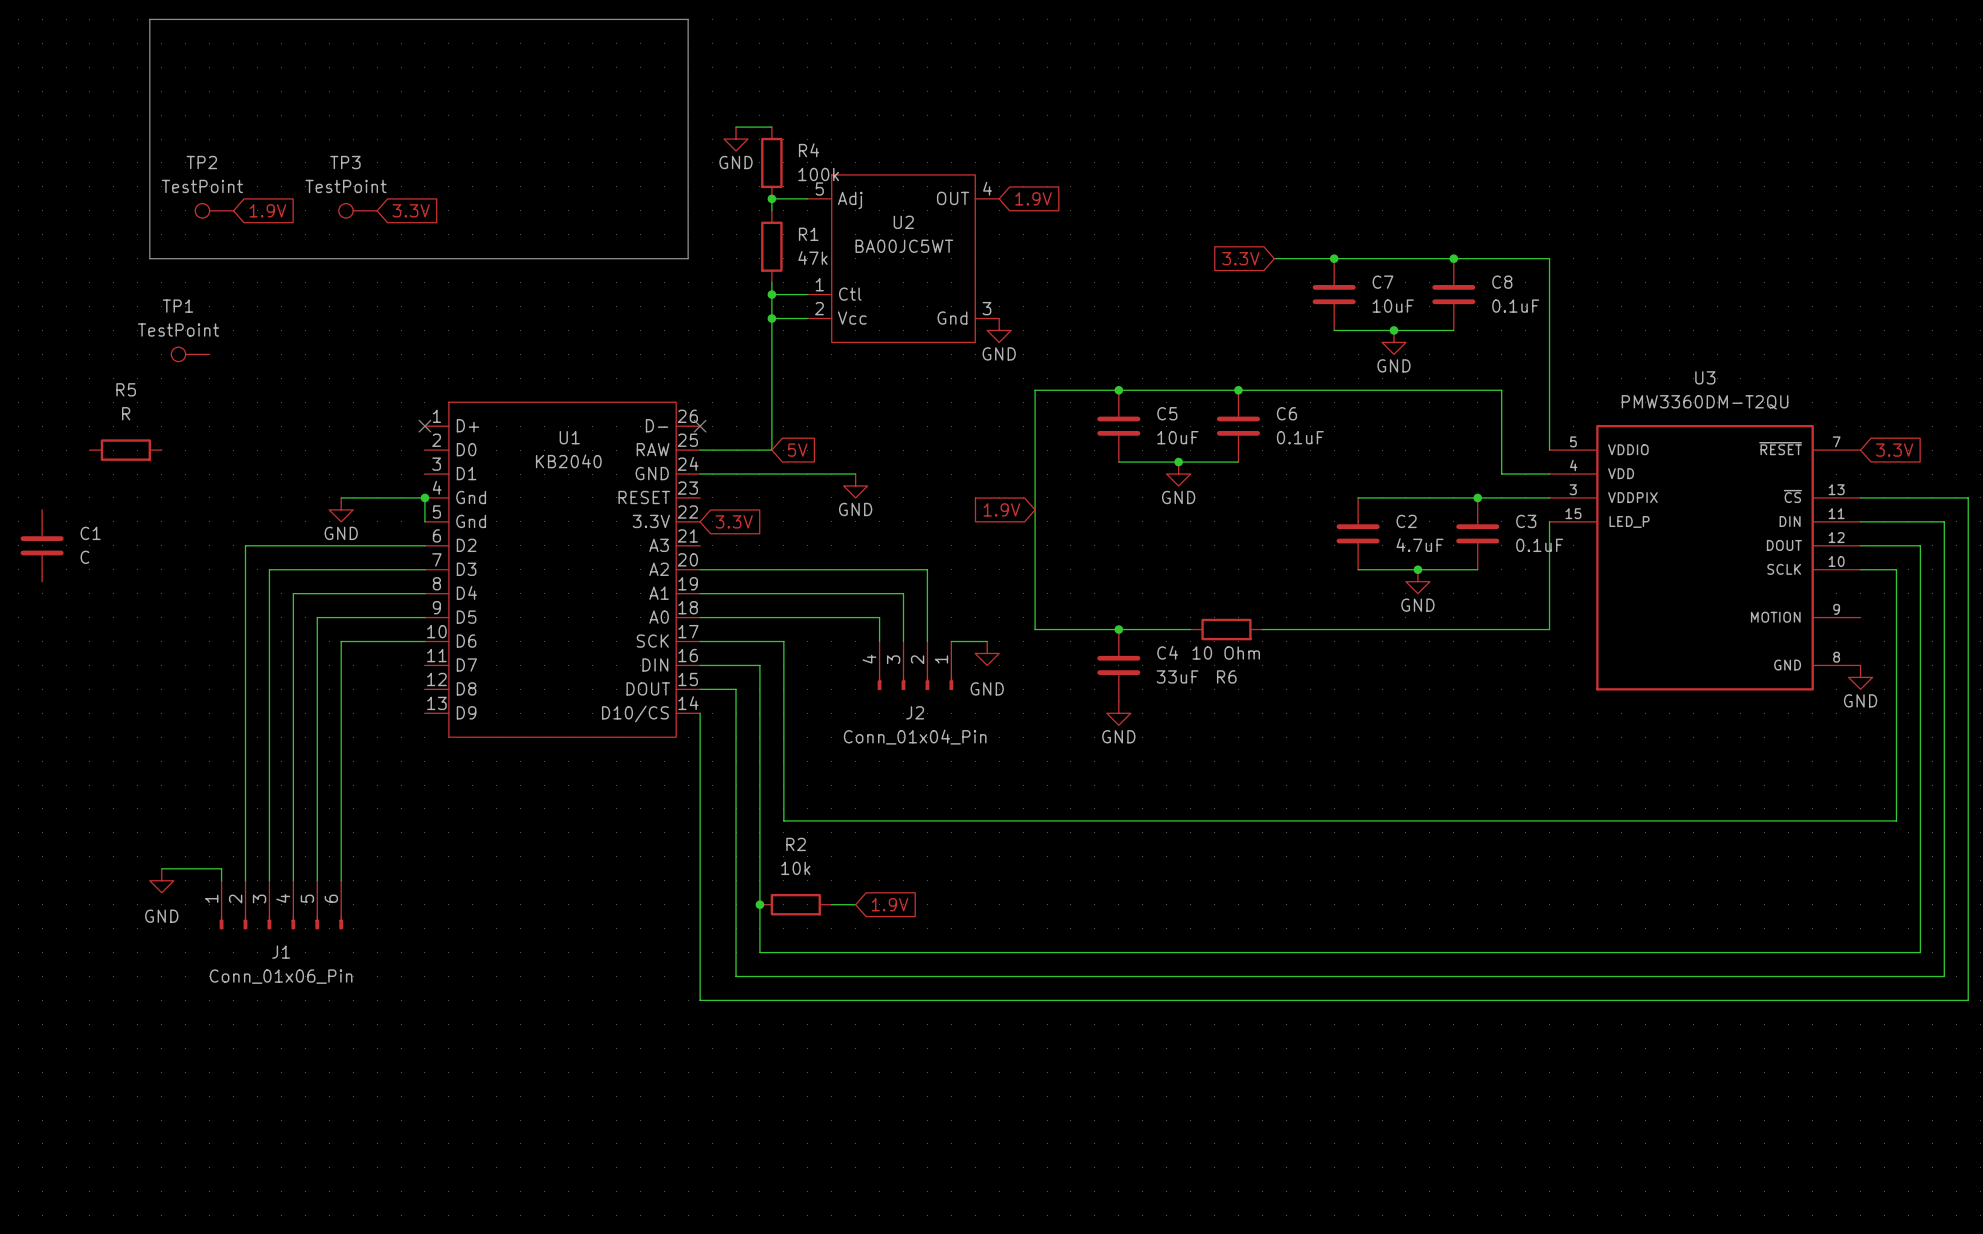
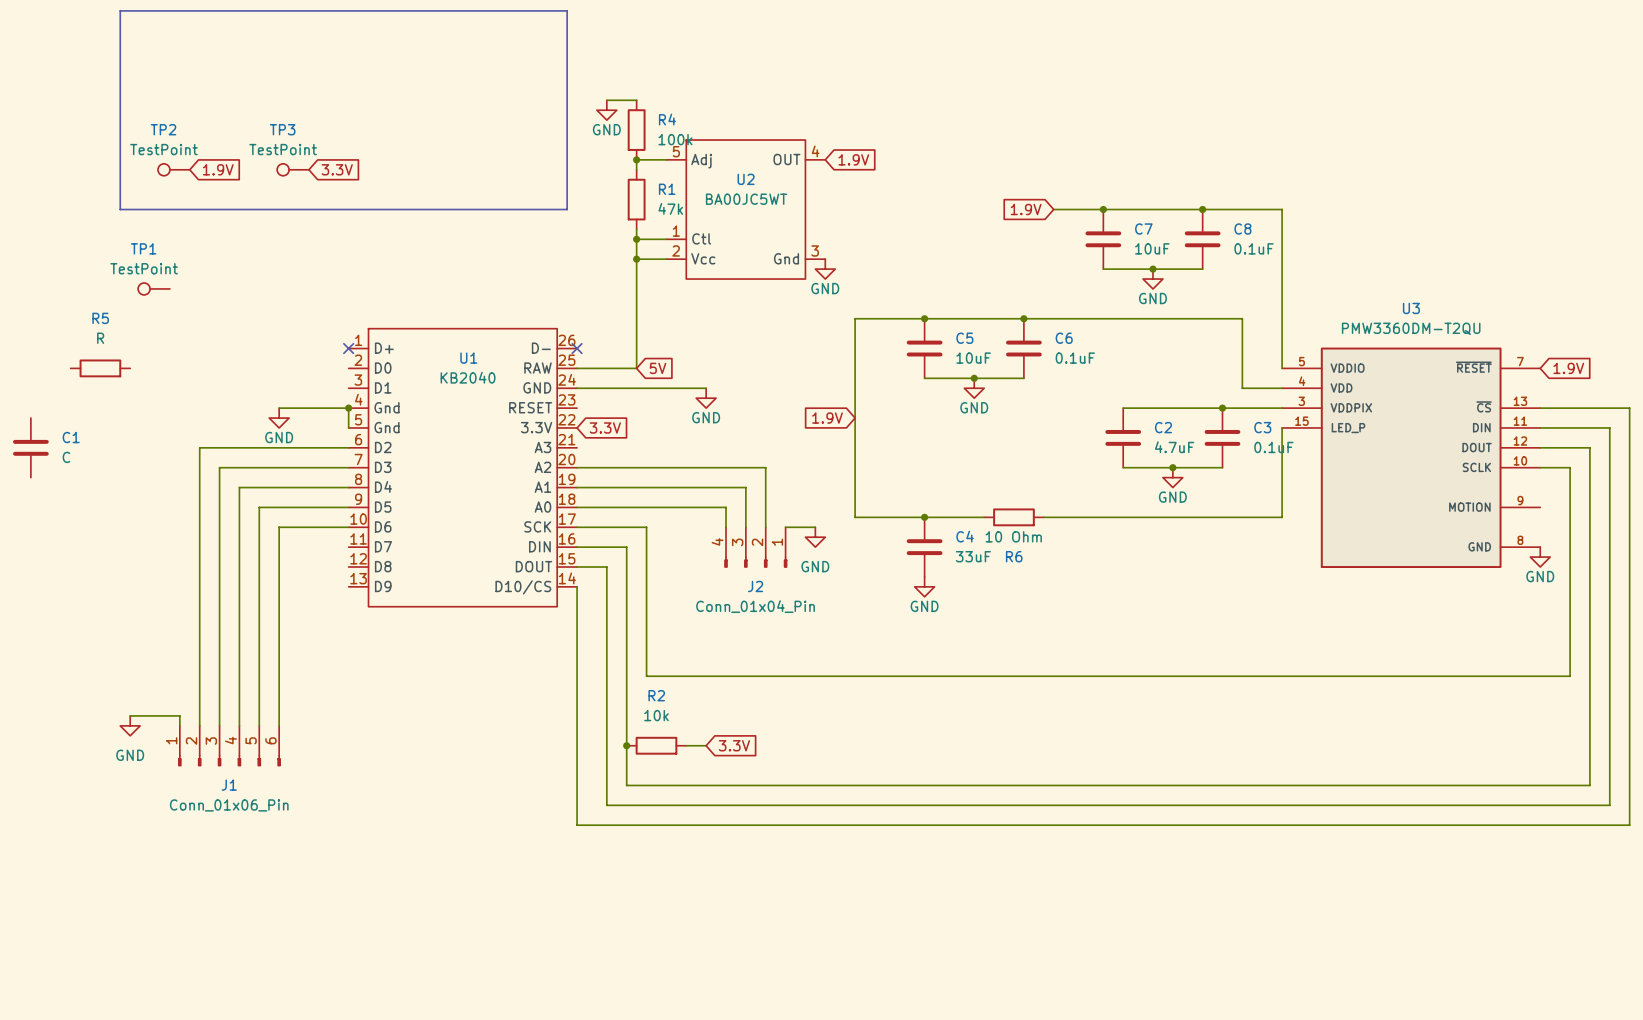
global label: 3.3V (1240, 258) -> 1.9V (1026, 209)
global label: 3.3V (1894, 450) -> 1.9V (1568, 368)
global label: 1.9V (889, 904) -> 3.3V (734, 745)

